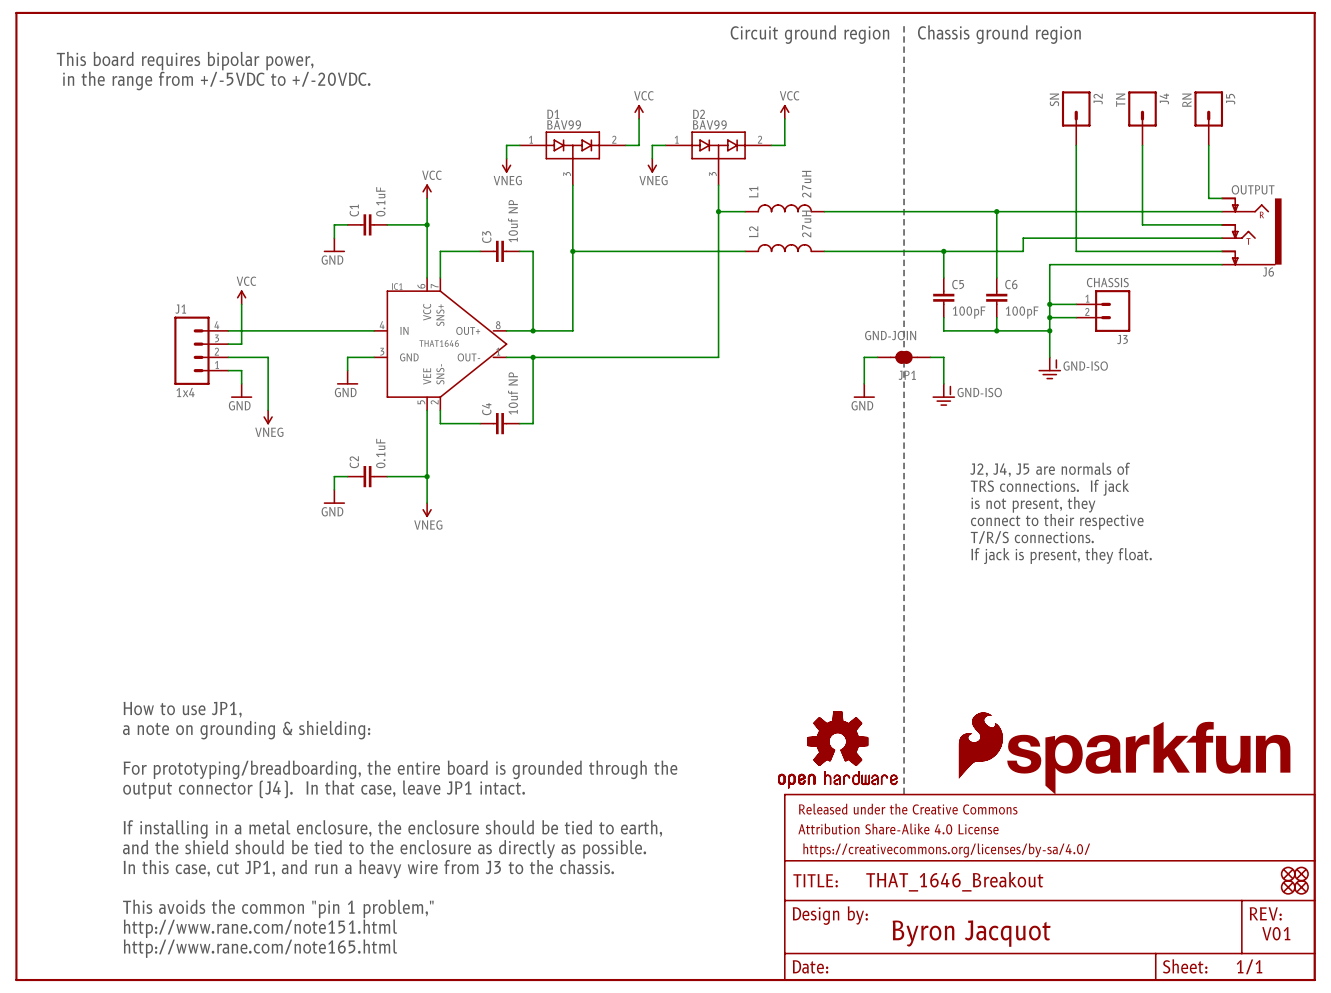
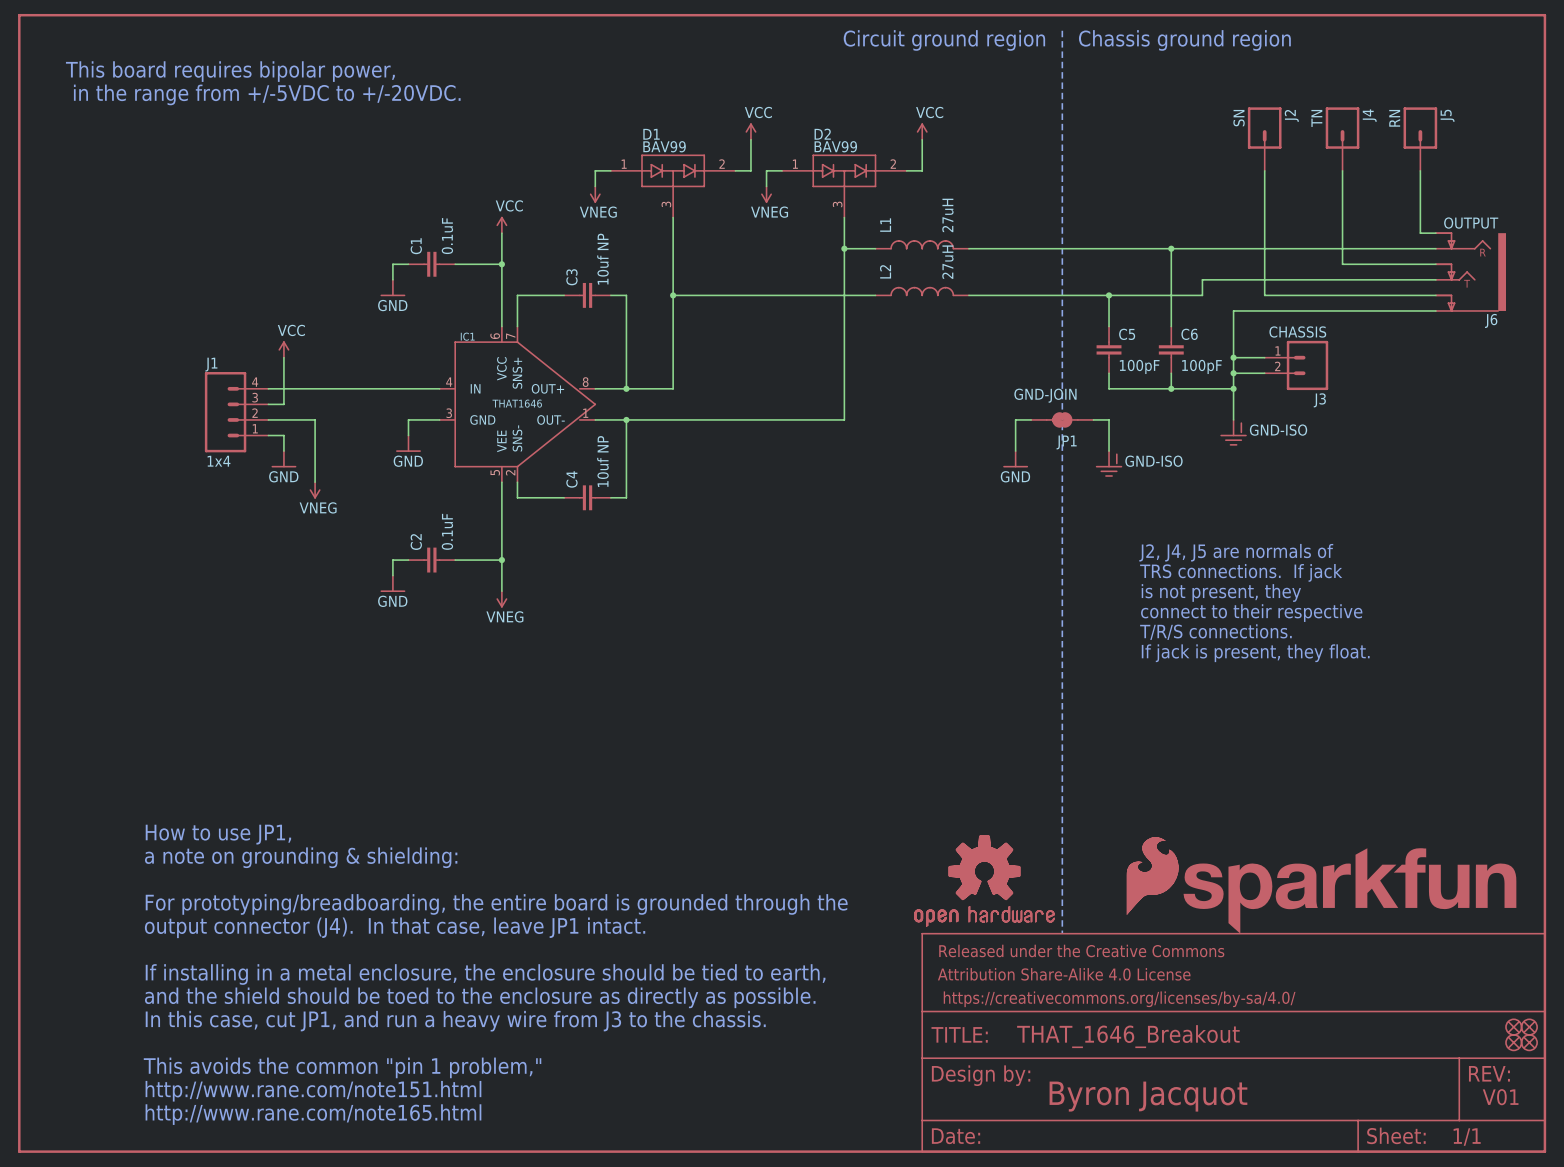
text: and the shield should be tied to the enclosure as directly as possible. (384, 849) -> and the shield should be toed to the enclosure as directly as possible. (480, 997)

